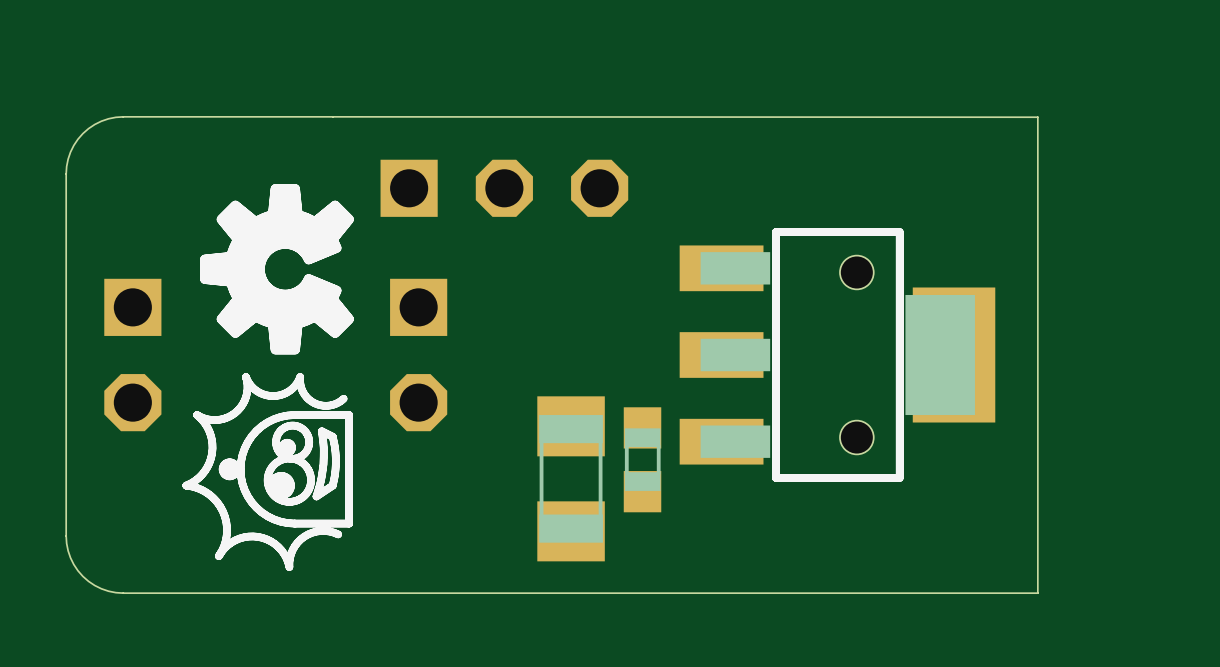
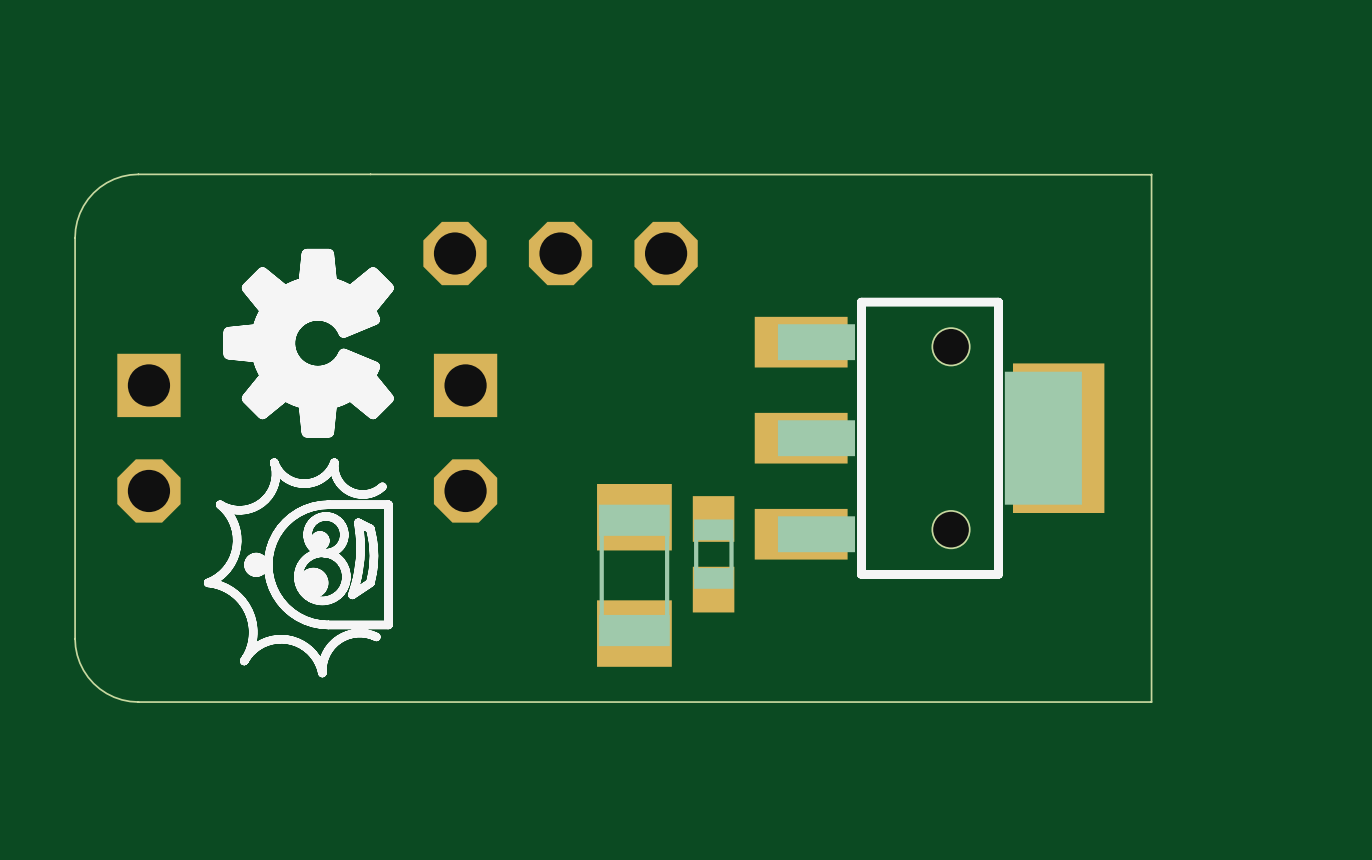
part footprint: [380, 159, 629, 217] -> [423, 221, 698, 286]

